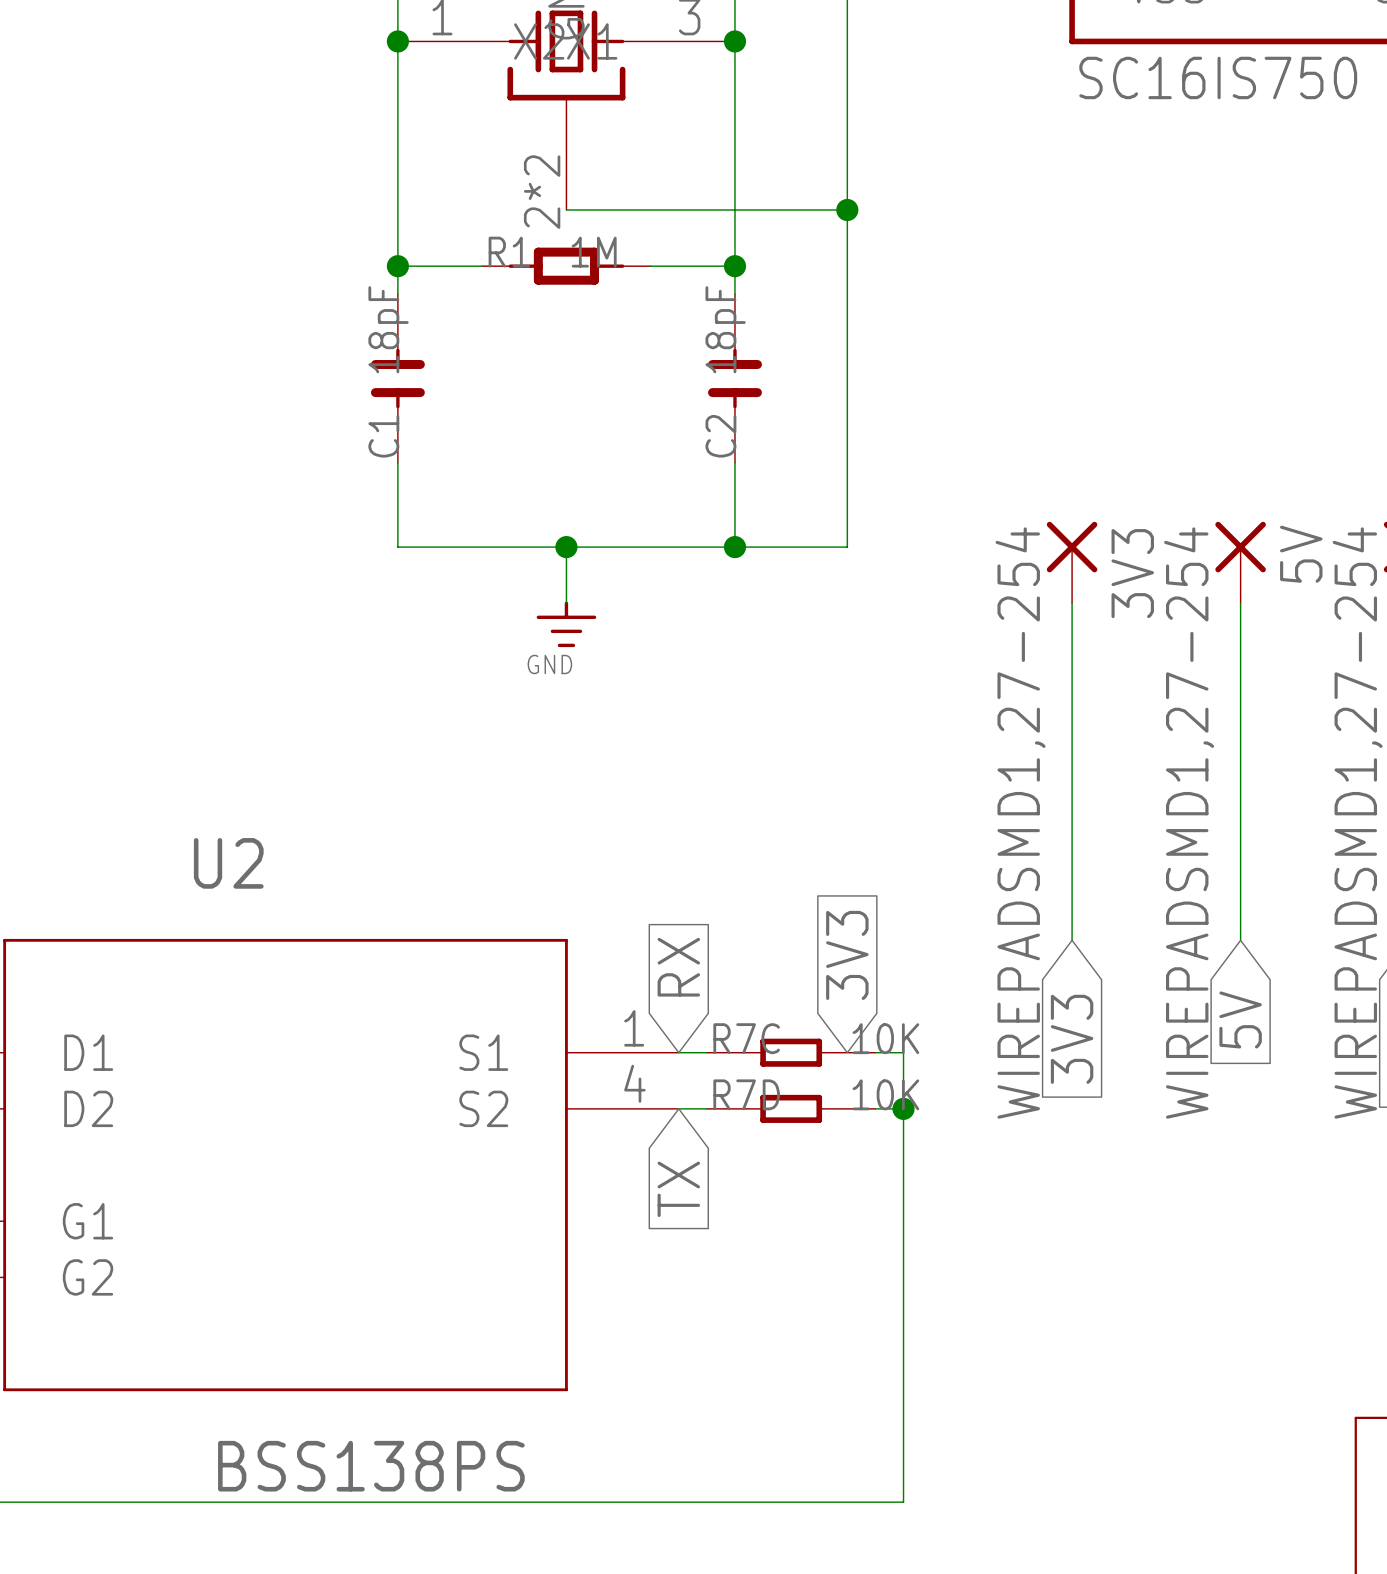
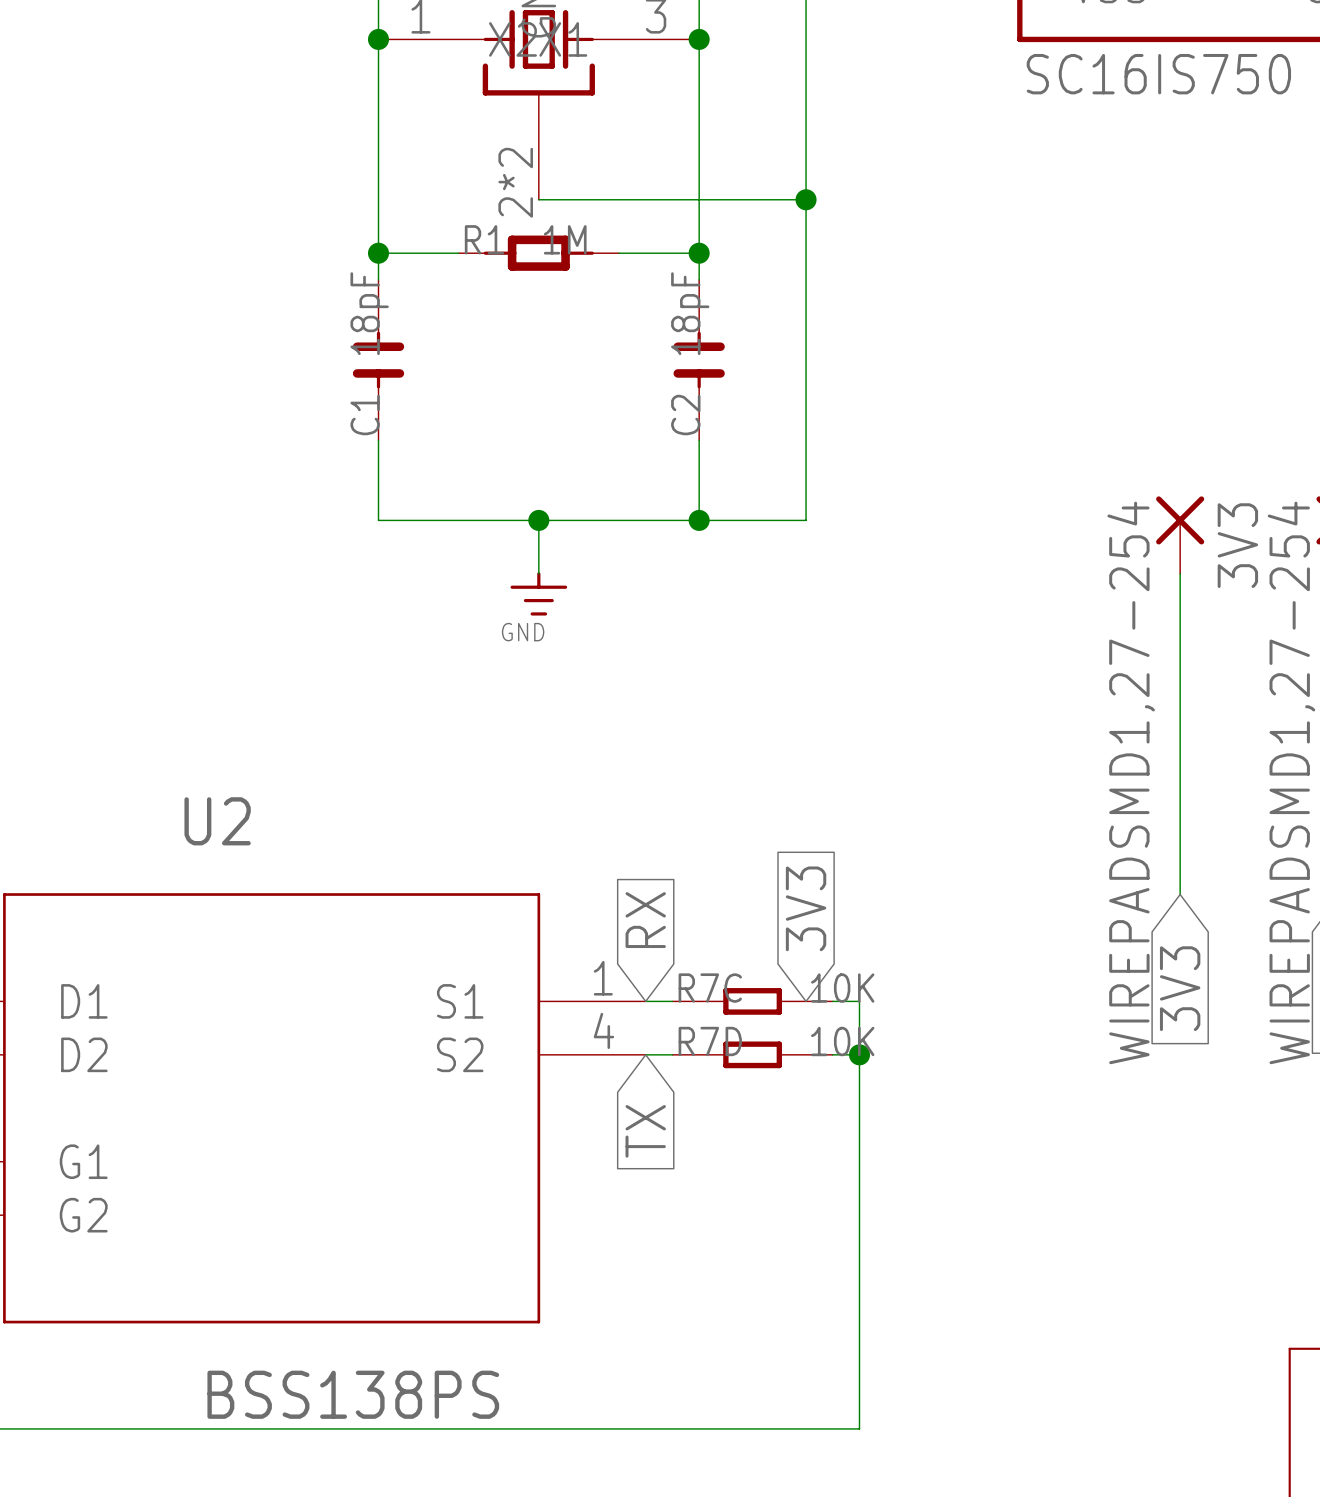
5V name: 5V (1301, 554) -> 3V3 (1237, 545)
3V3: WIREPADSMD1,27-254 (1072, 562) -> none
wire: (1072, 603) (1072, 940) -> none
global label: 5V (1240, 1019) -> 3V3 (1180, 988)
global label: 3V3 (1072, 1039) -> none

